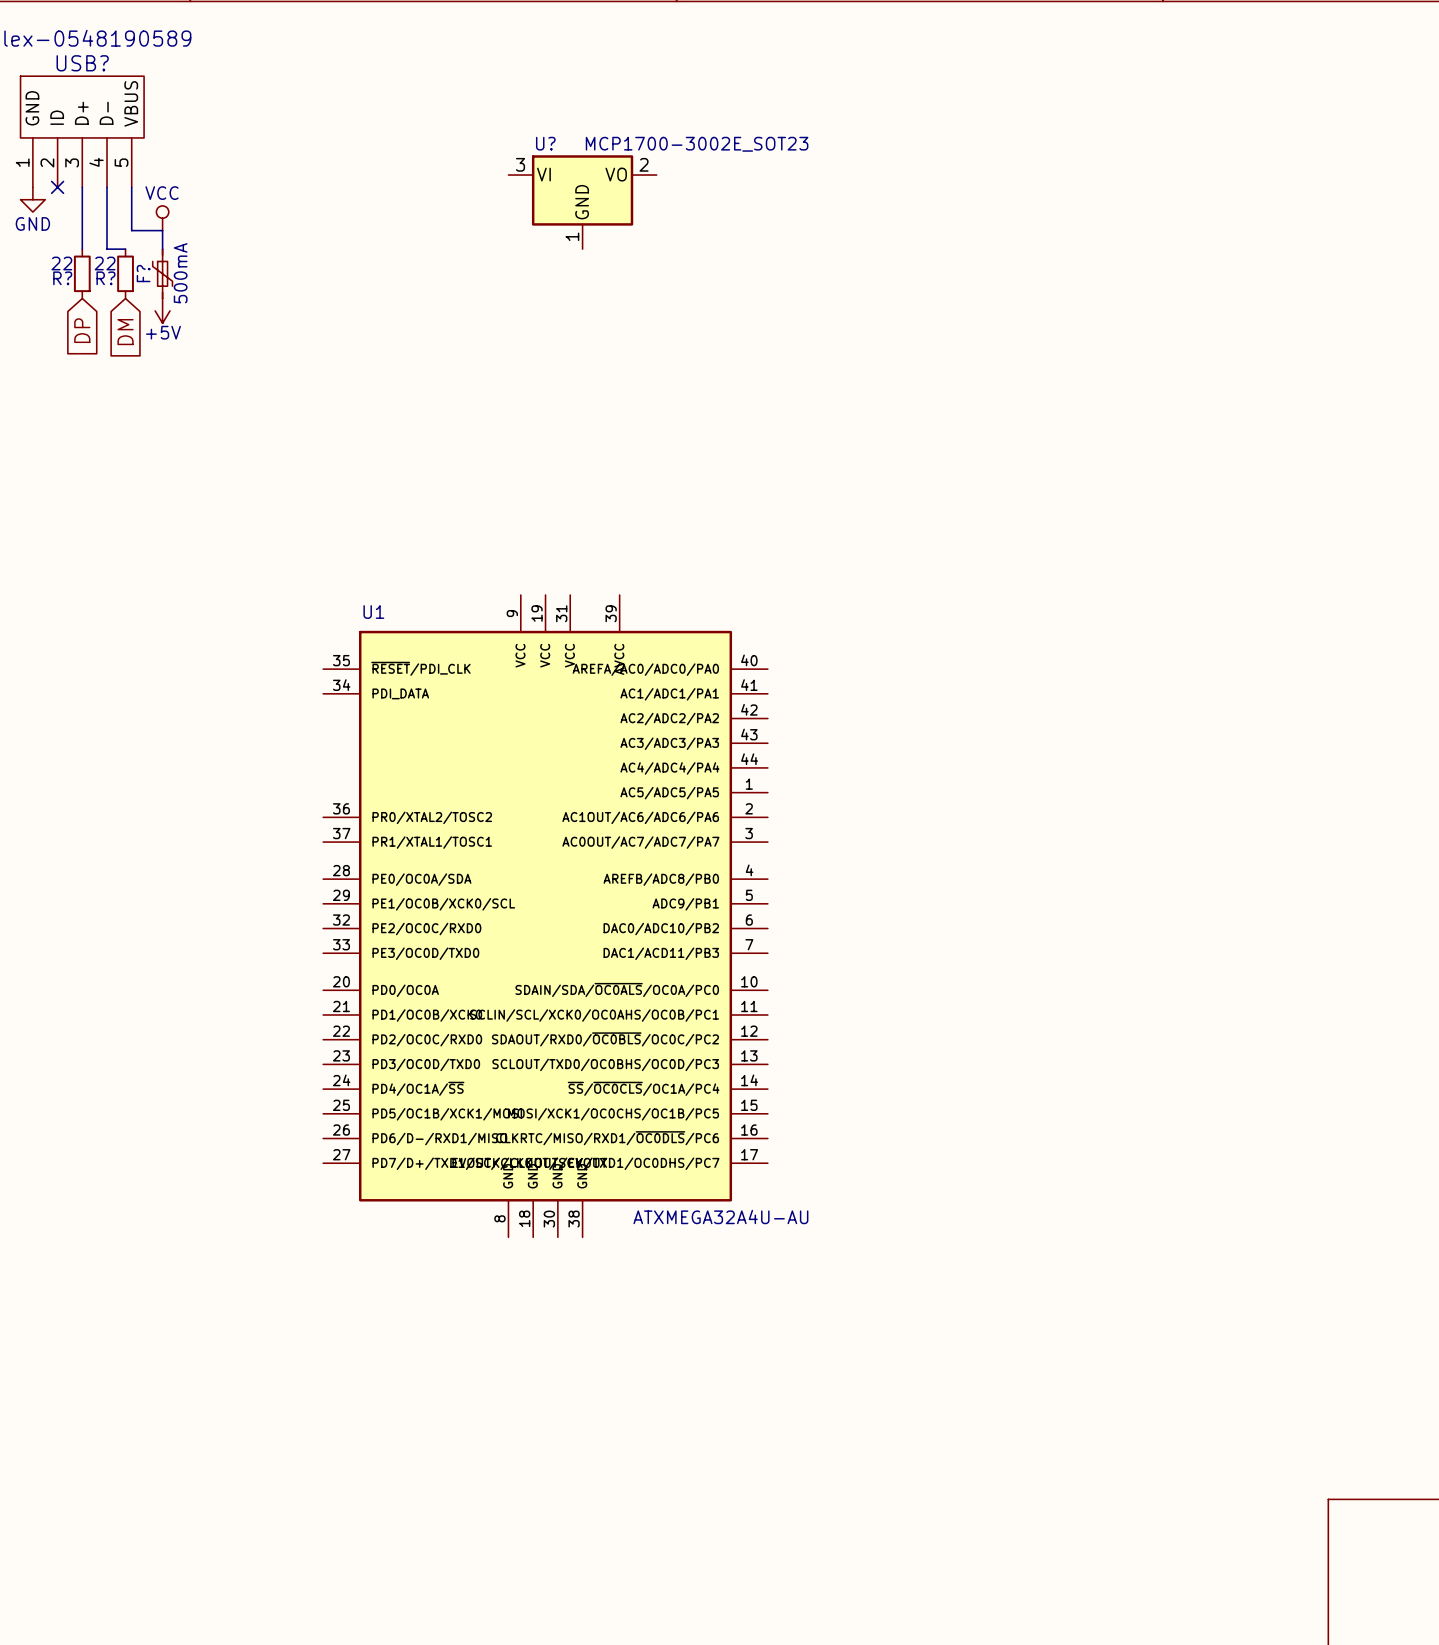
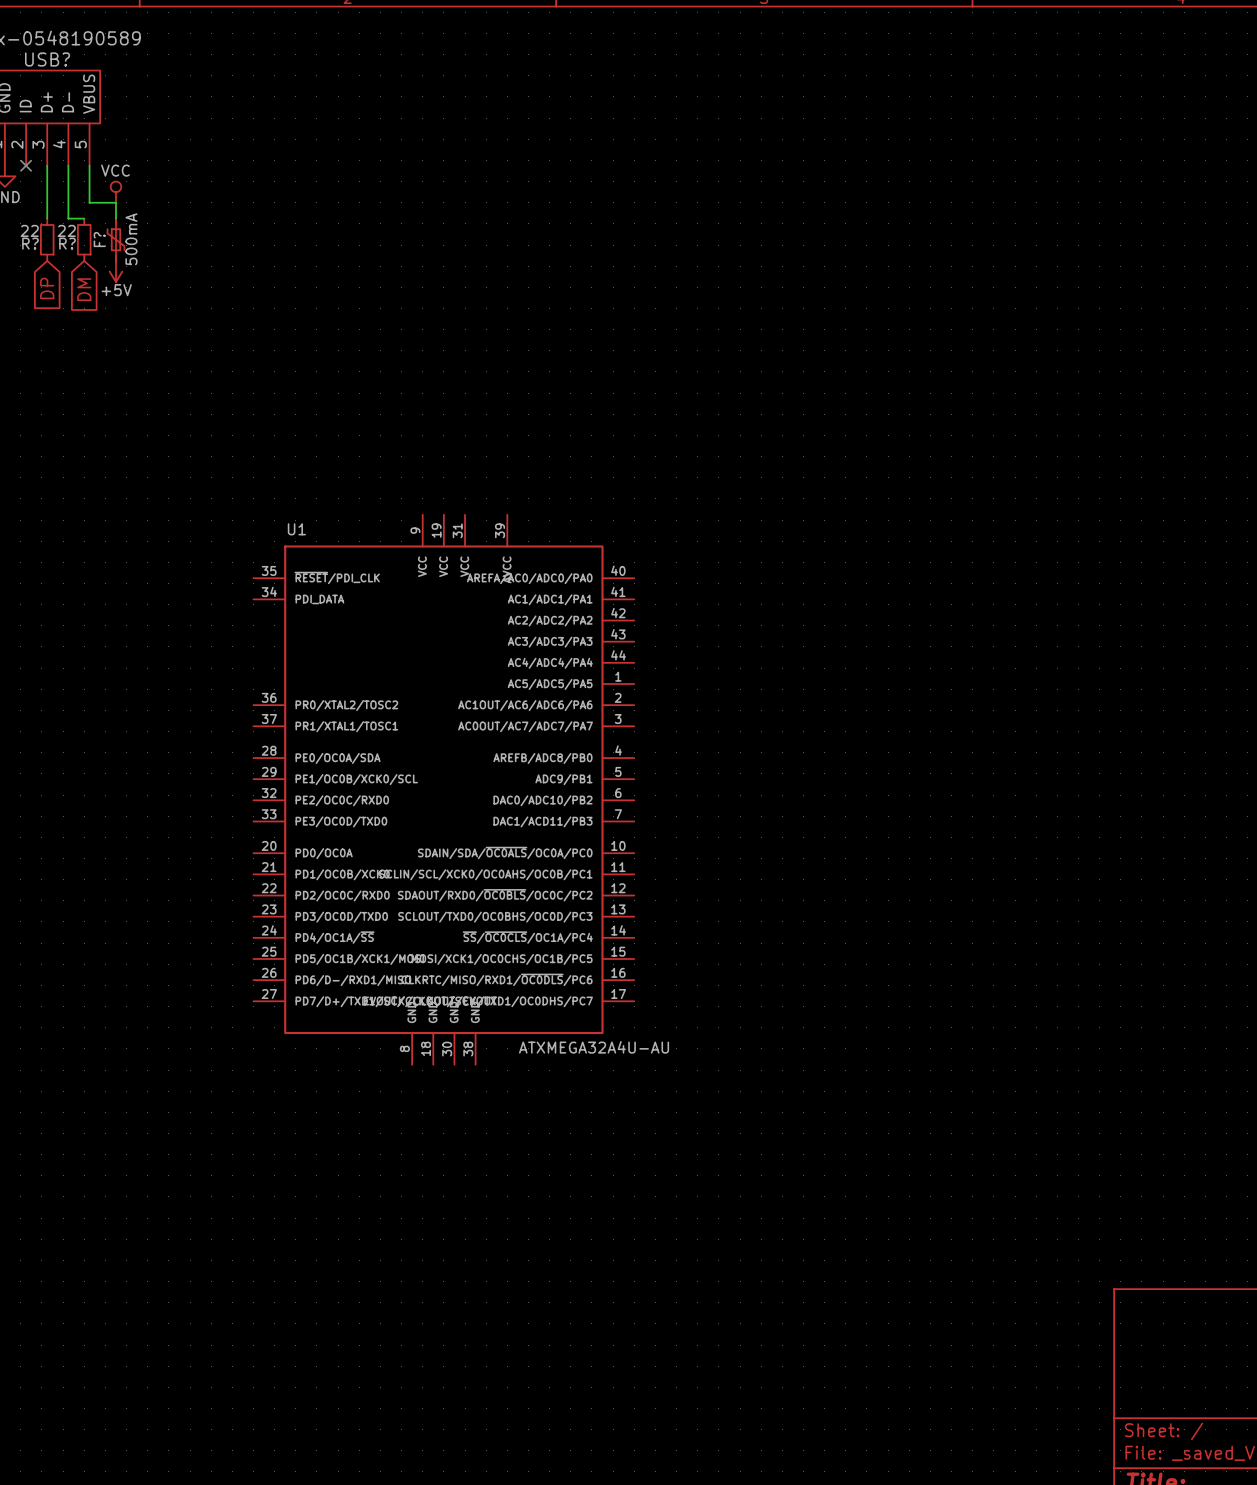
U?: MCP1700-3002E_SOT23 (582, 202) -> none

